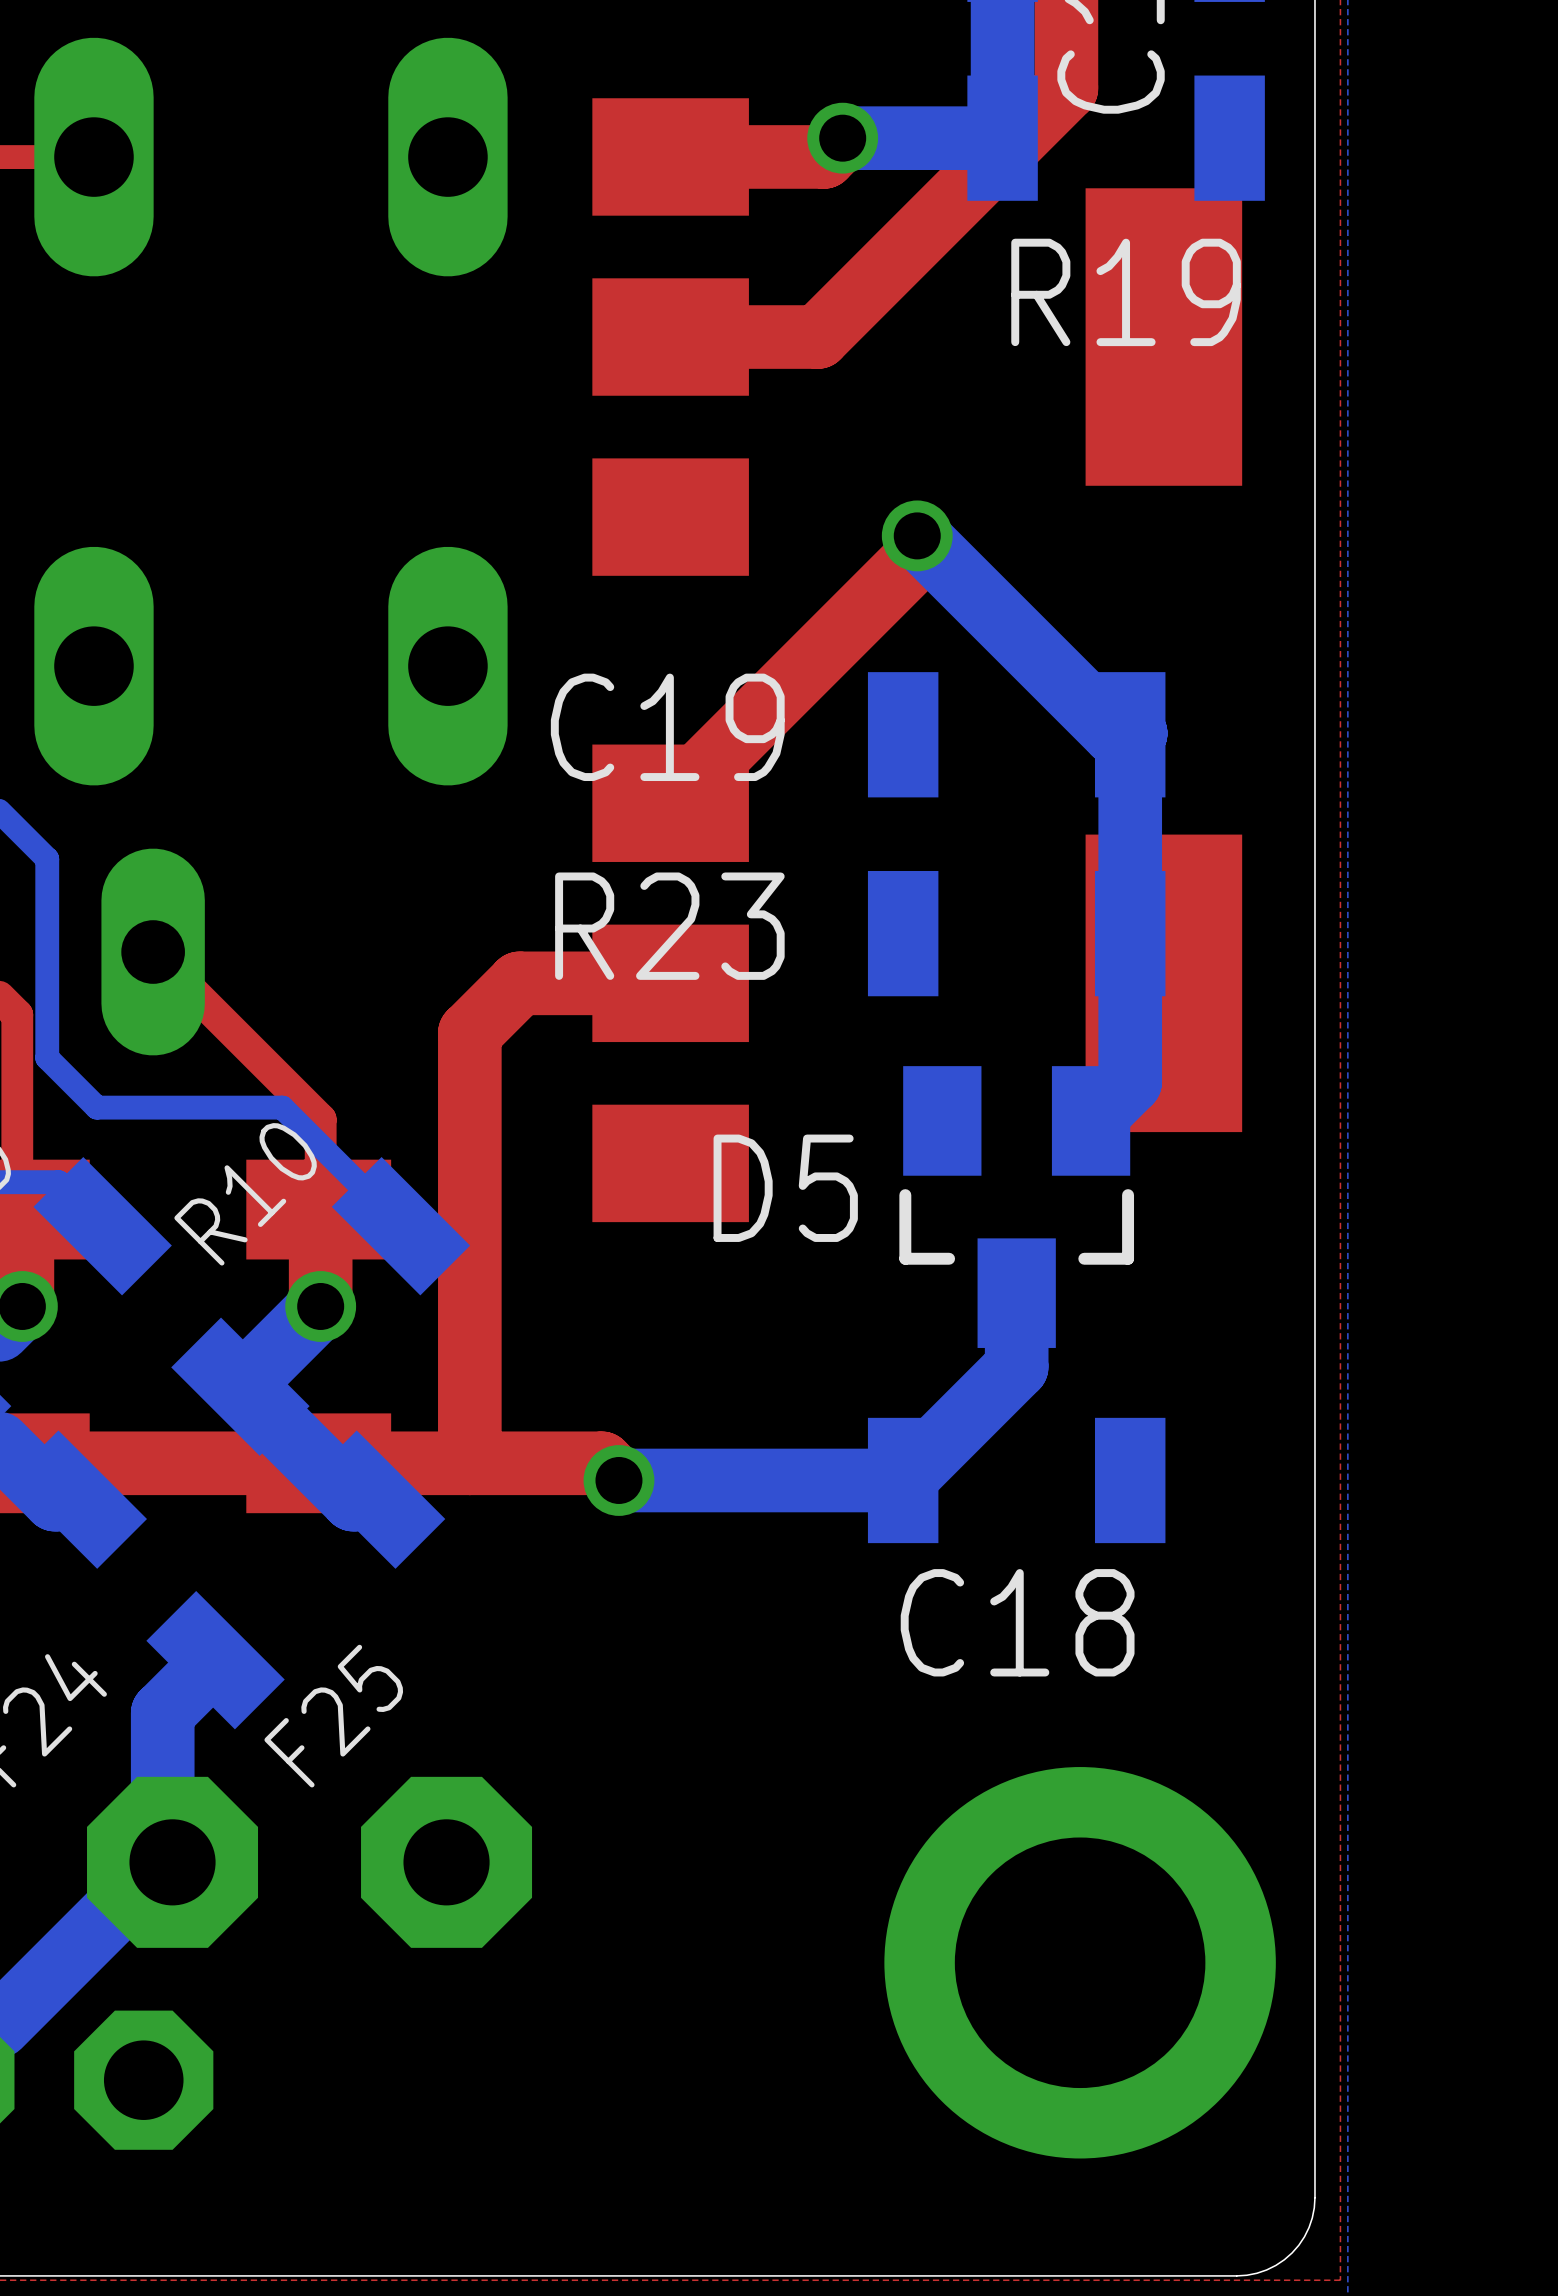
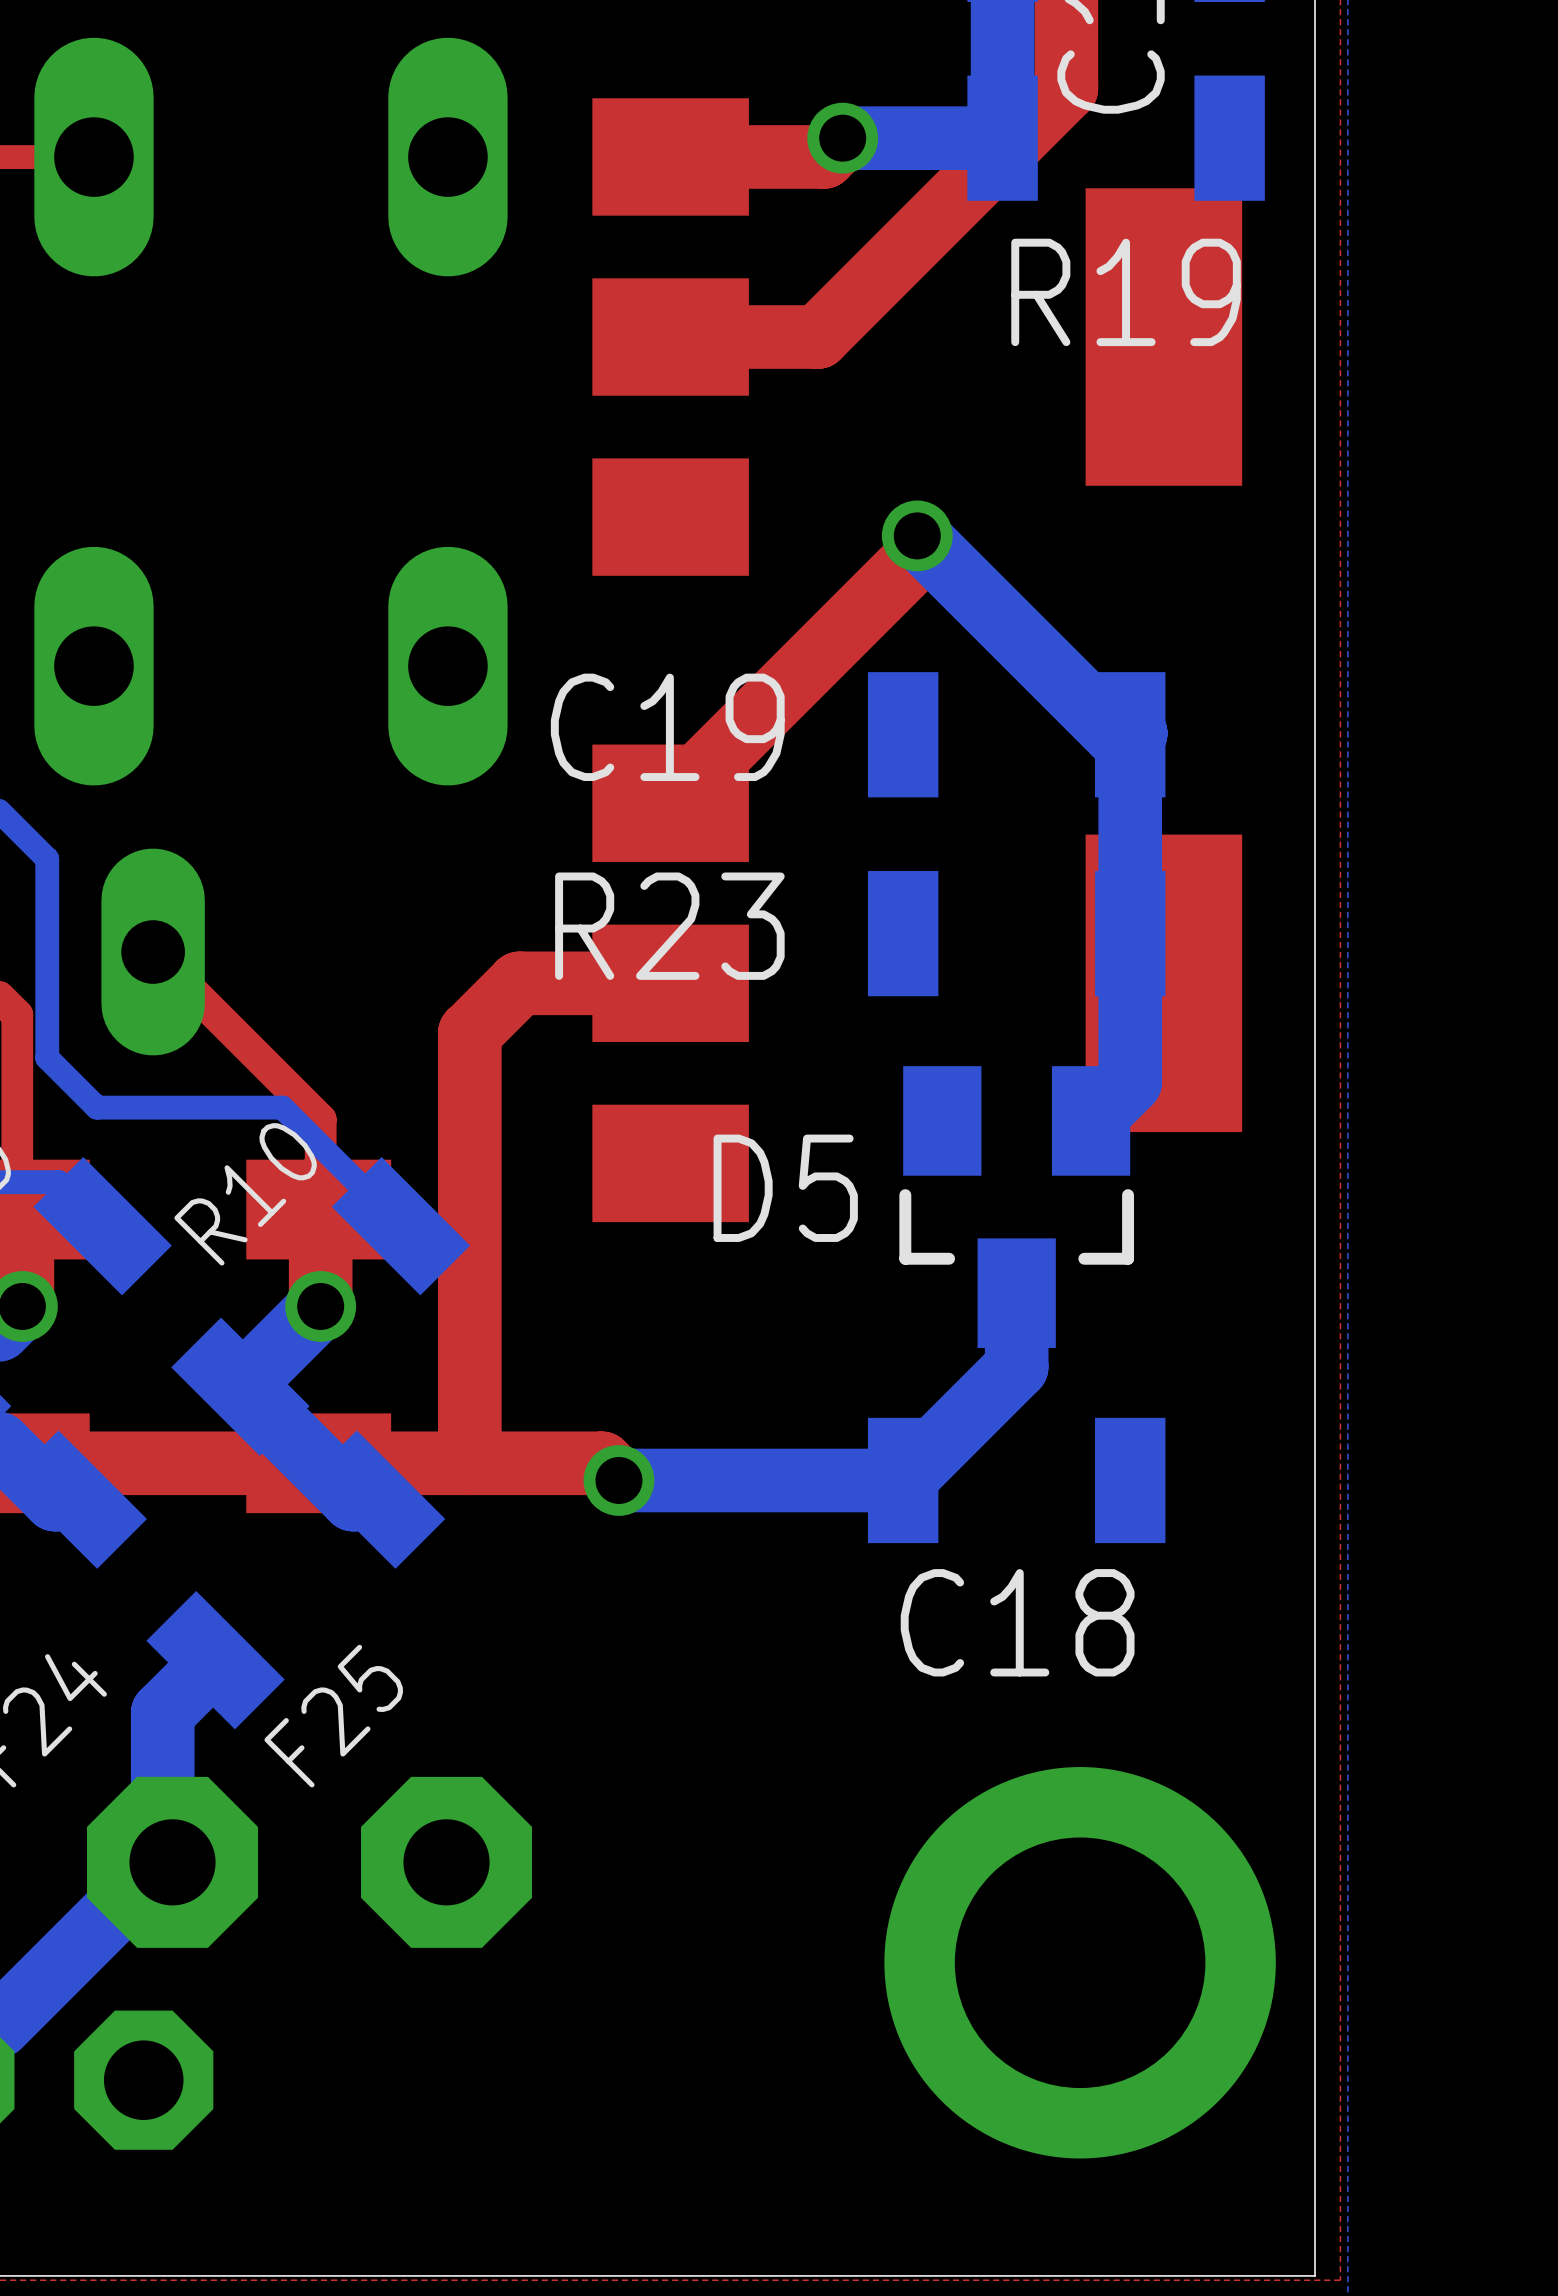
board edge: (1314, 2197) (1309, 2227) (1292, 2253) (1266, 2269) (1236, 2275) -> (1314, 2197) (1314, 2275) (1236, 2275)

